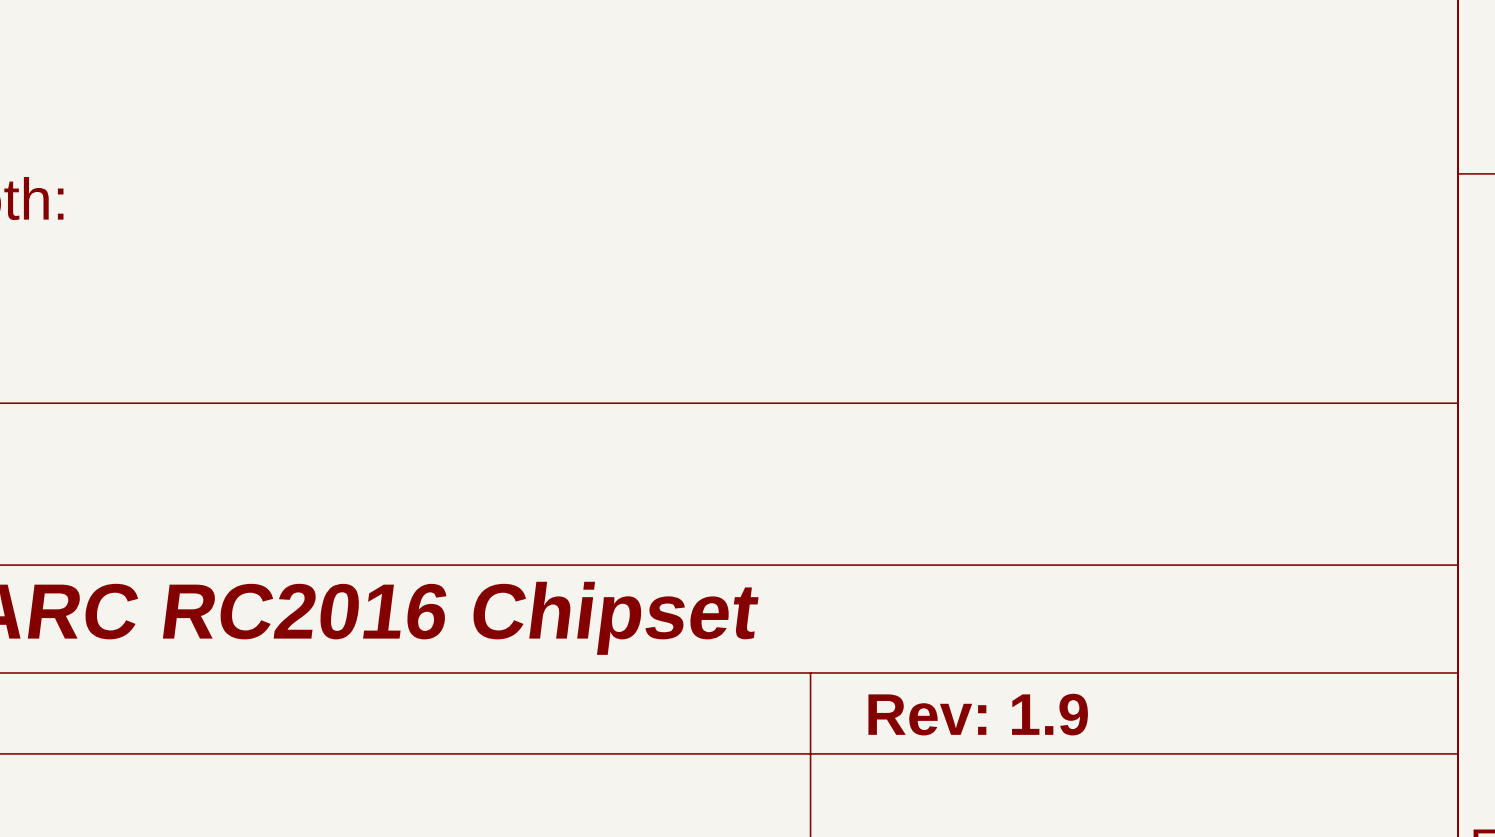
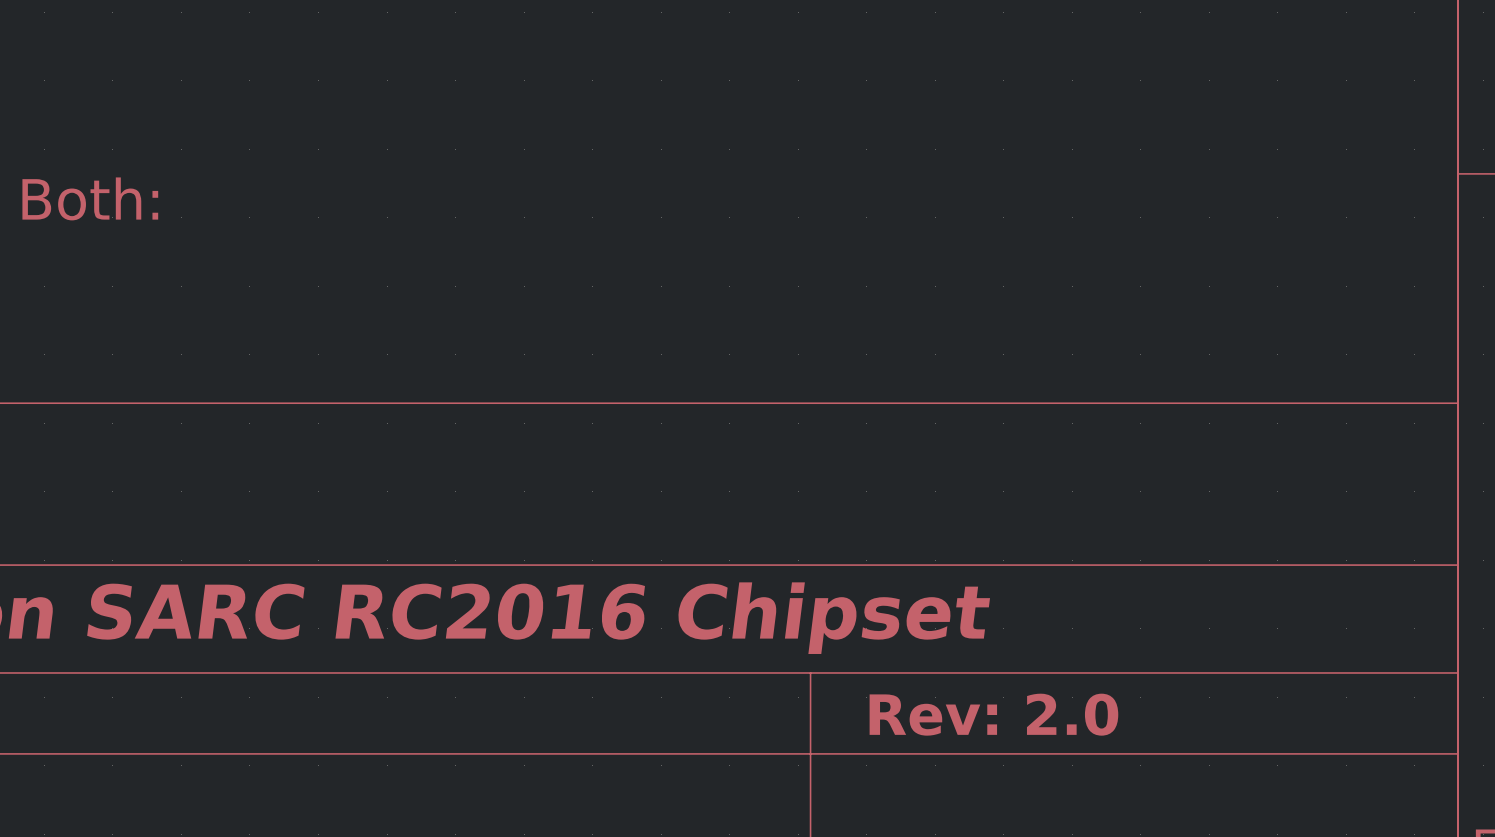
title block: Rev: 1.9 (978, 714) -> Rev: 2.0 (993, 714)

